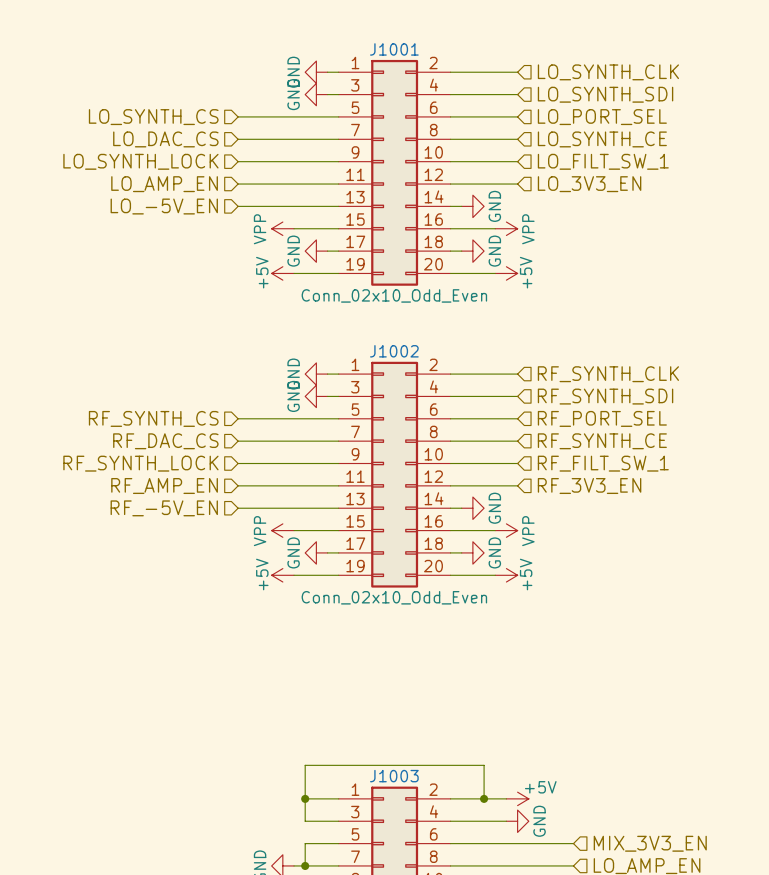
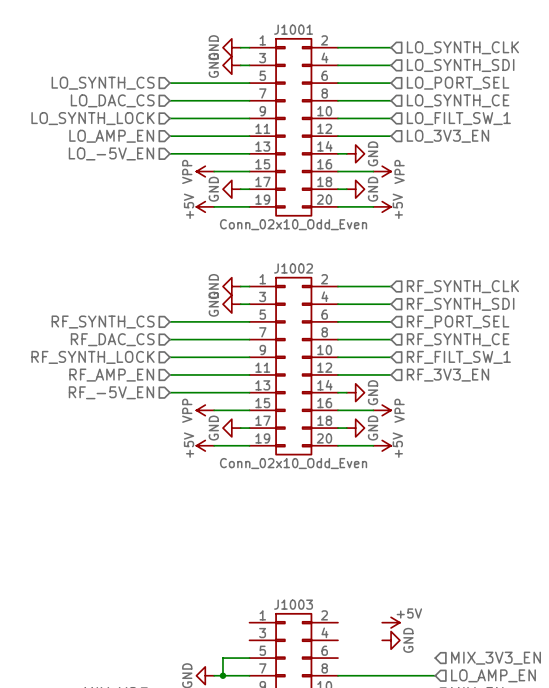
wire: (305, 798) (338, 798) -> none
junction: (305, 798) -> none
wire: (450, 798) (506, 798) -> none
wire: (484, 798) (484, 765) (305, 765) (305, 821) (338, 821) -> none
junction: (484, 798) -> none
wire: (450, 821) (506, 821) -> none
wire: (450, 843) (573, 843) -> none

